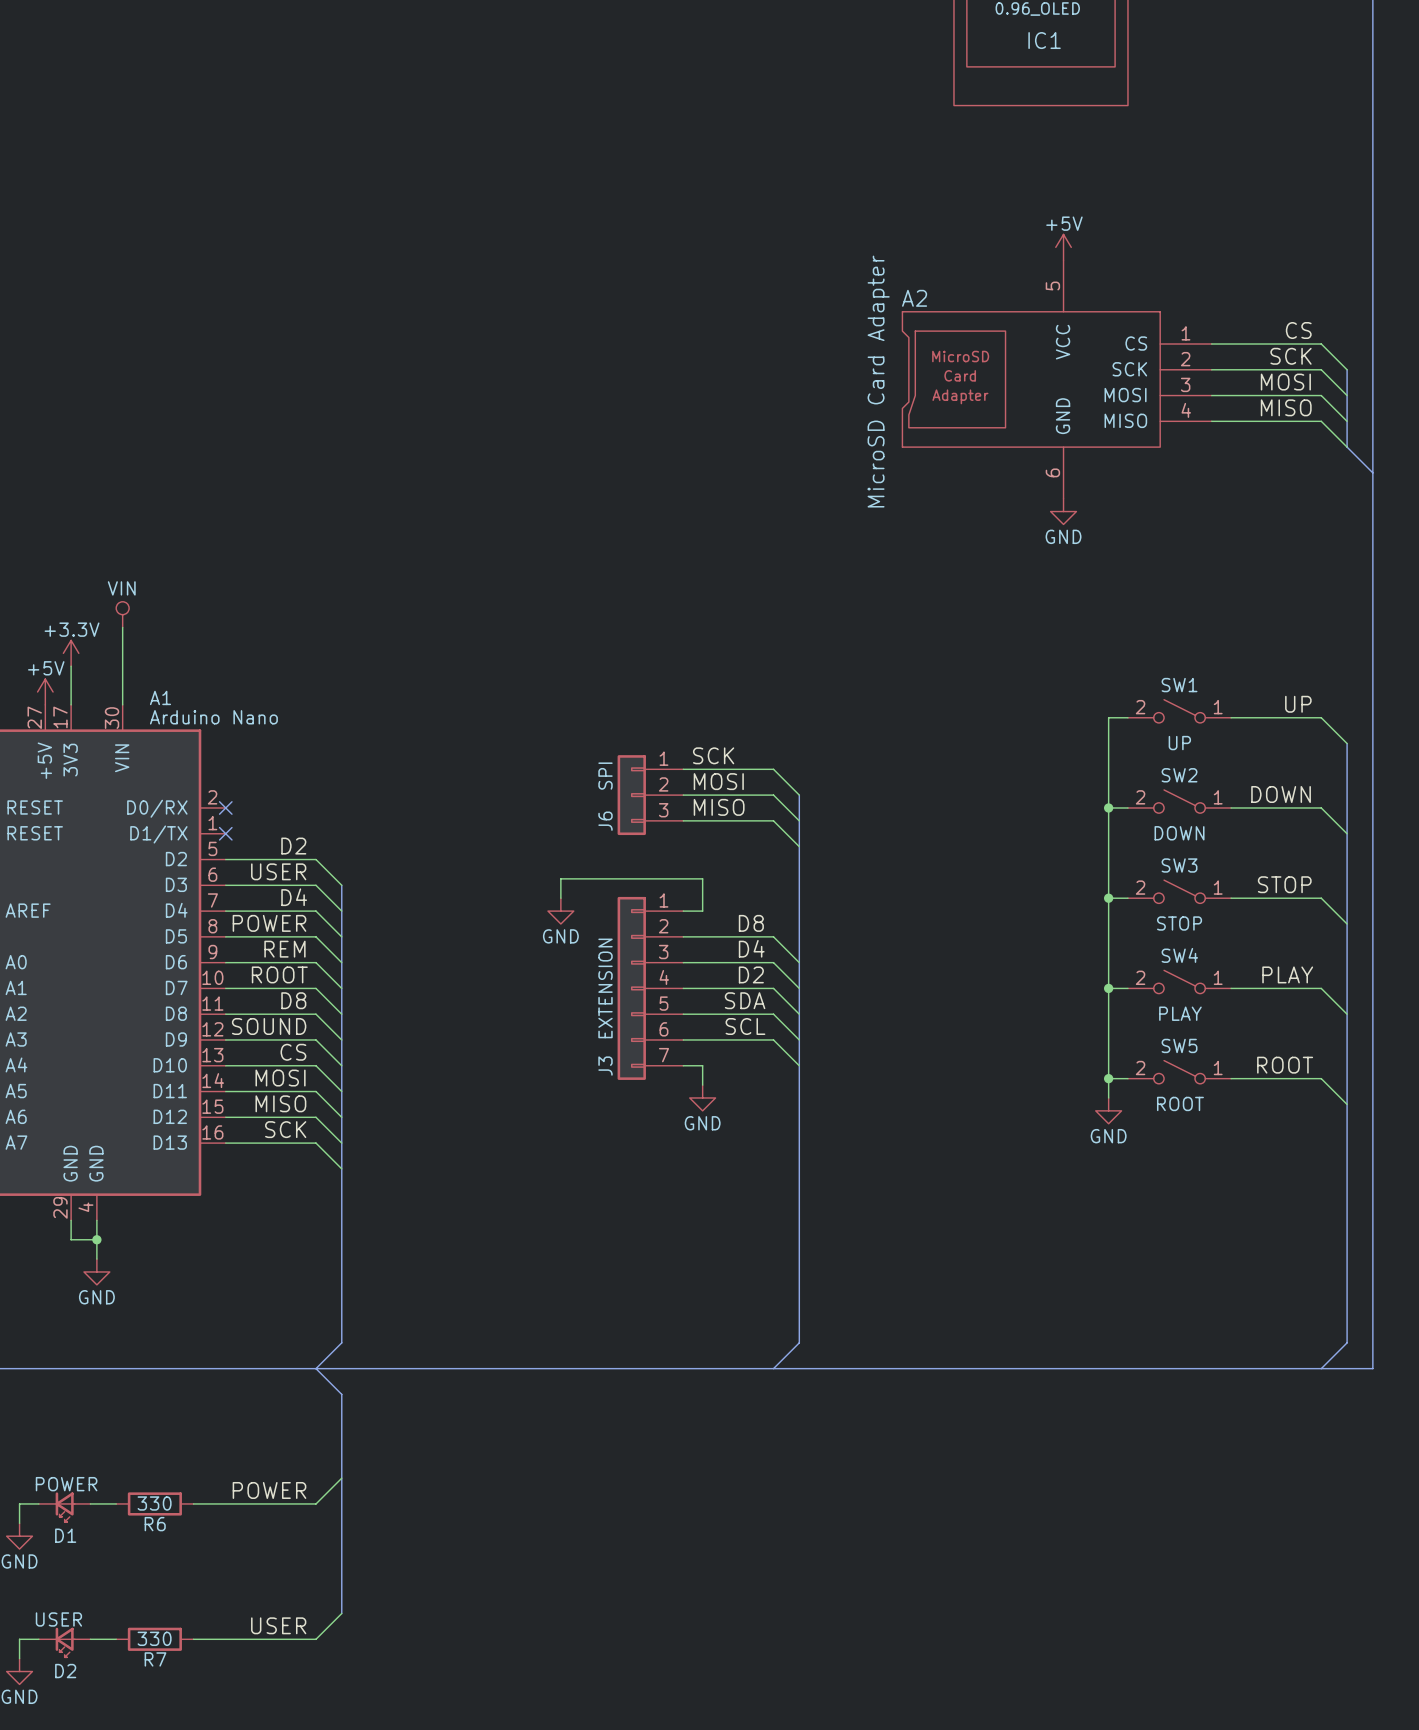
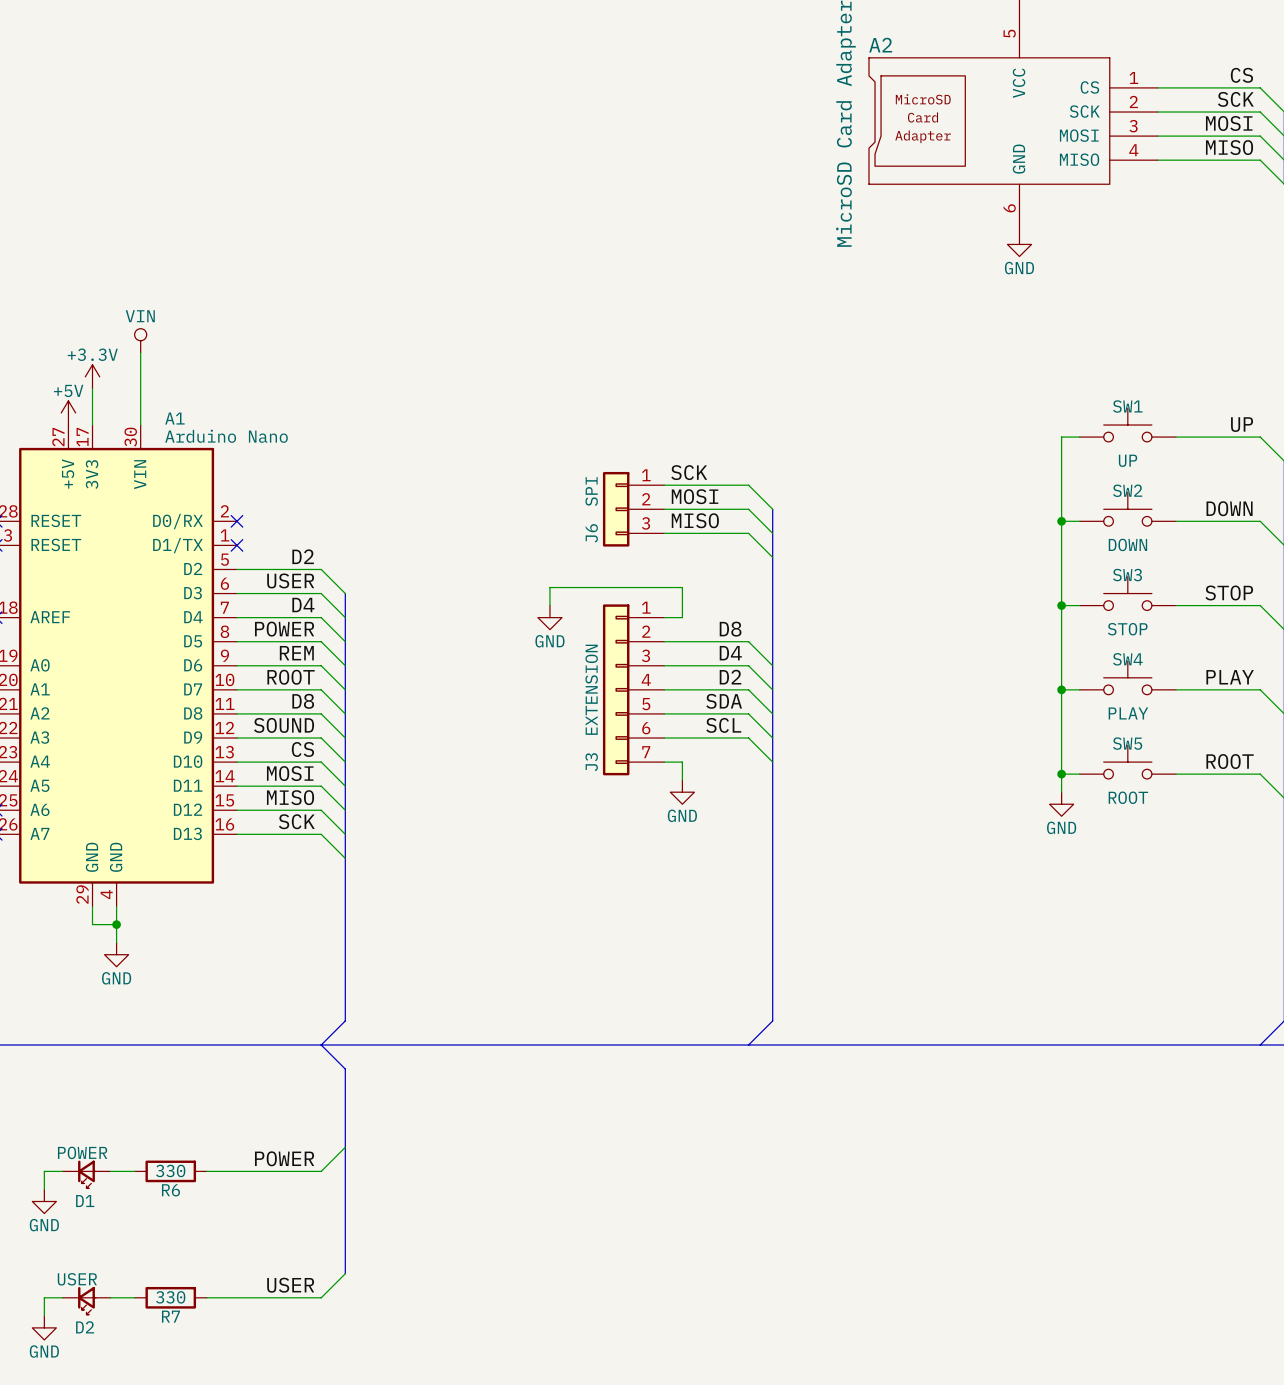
SW1 symbol: [1127, 699, 1232, 723] -> [1079, 408, 1176, 442]
SW2 symbol: [1127, 789, 1232, 814] -> [1079, 492, 1176, 527]
SW3 symbol: [1127, 880, 1232, 904] -> [1079, 576, 1176, 611]
SW4 symbol: [1127, 970, 1232, 994] -> [1079, 660, 1176, 695]
SW5 symbol: [1127, 1060, 1232, 1084] -> [1079, 745, 1176, 779]

